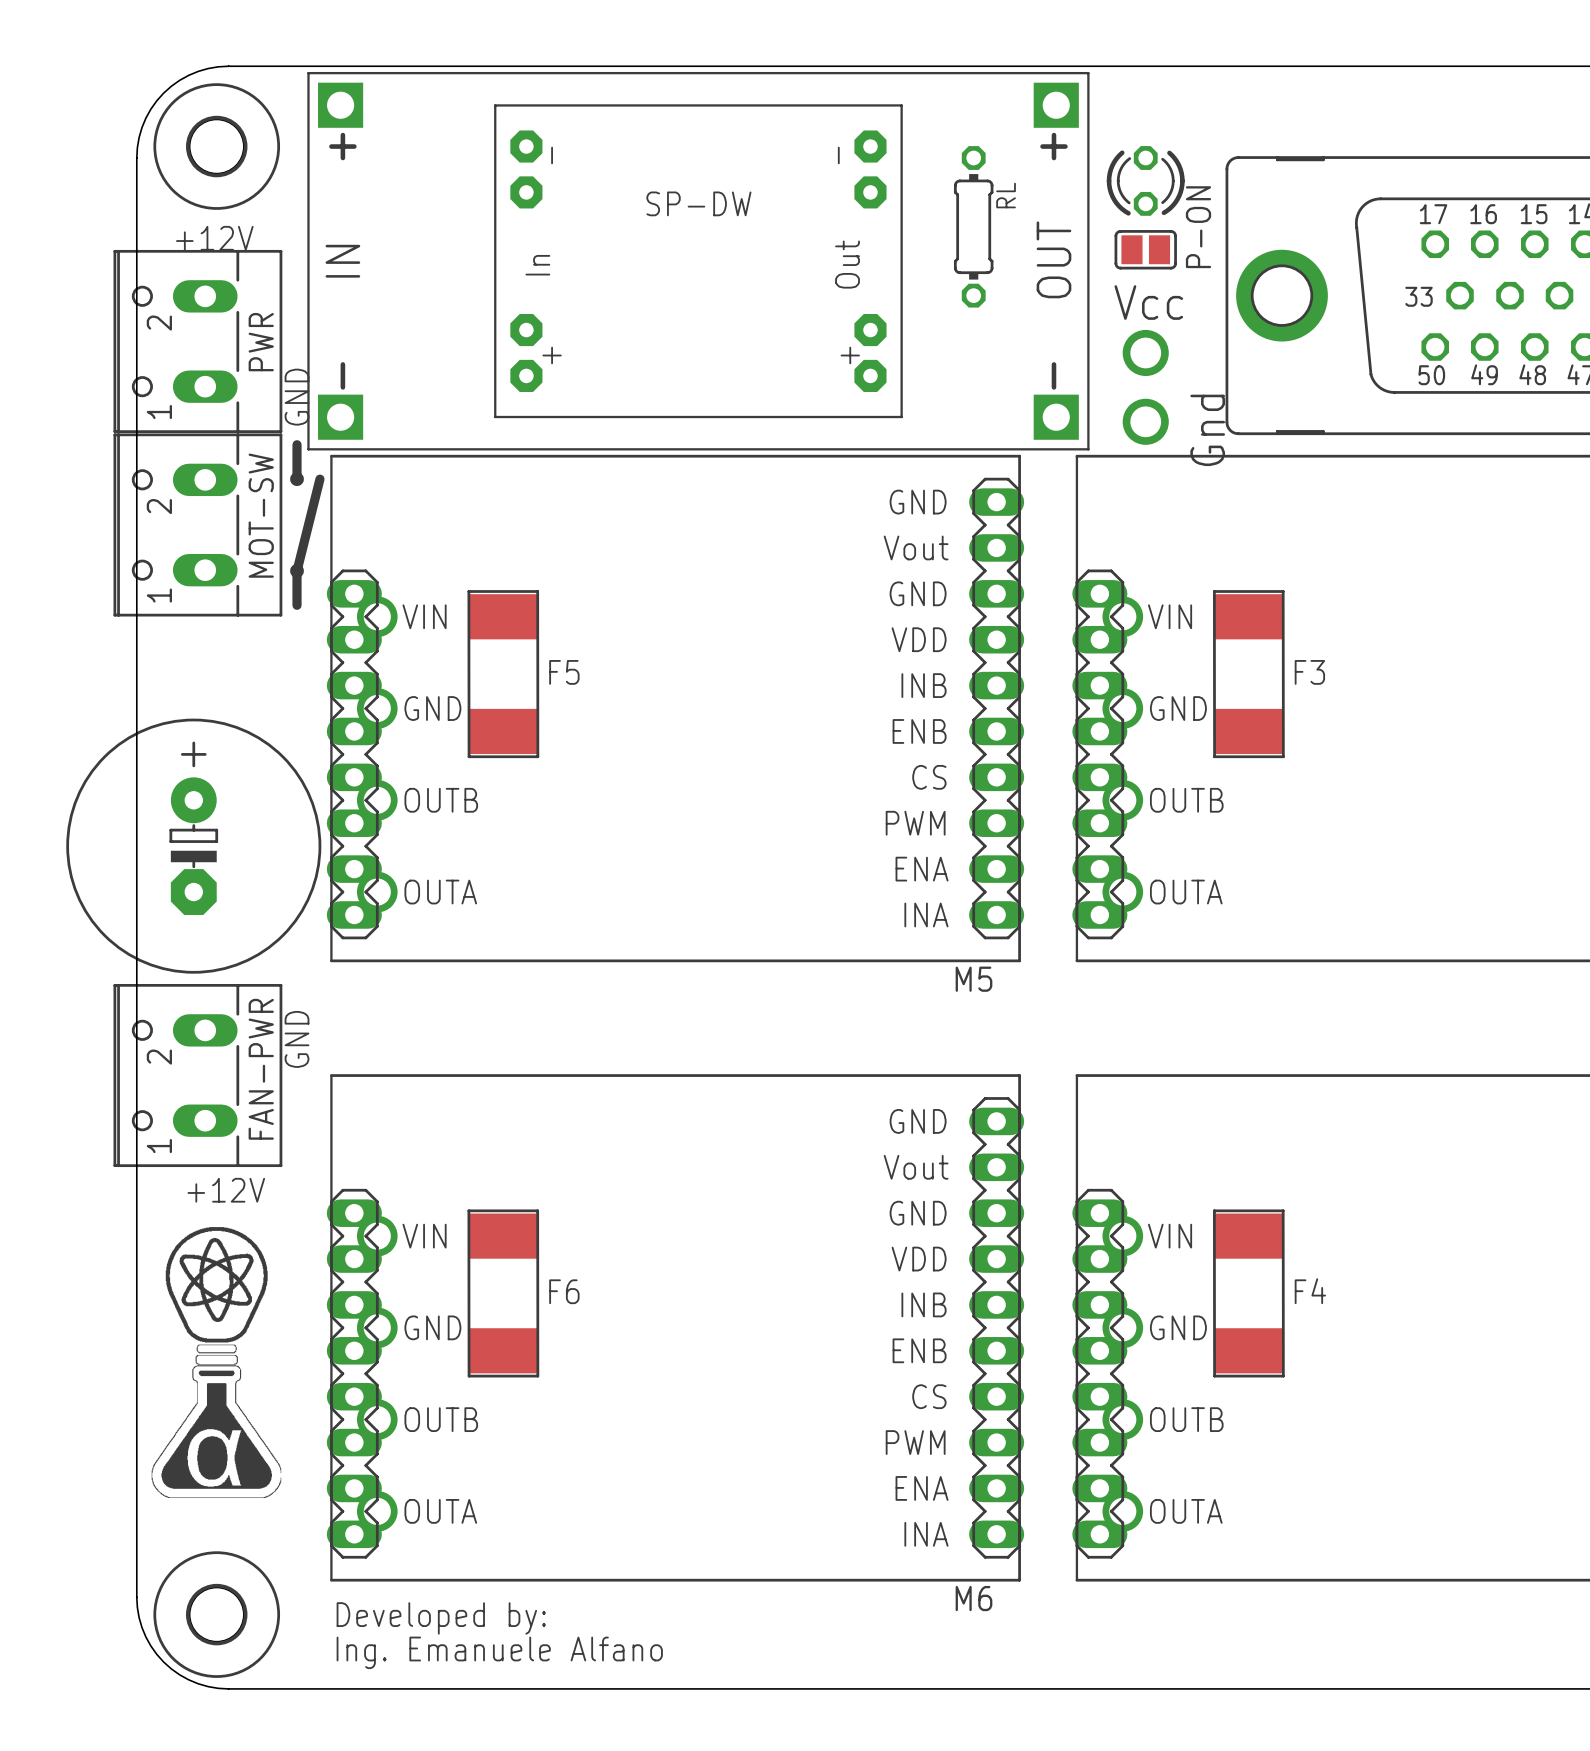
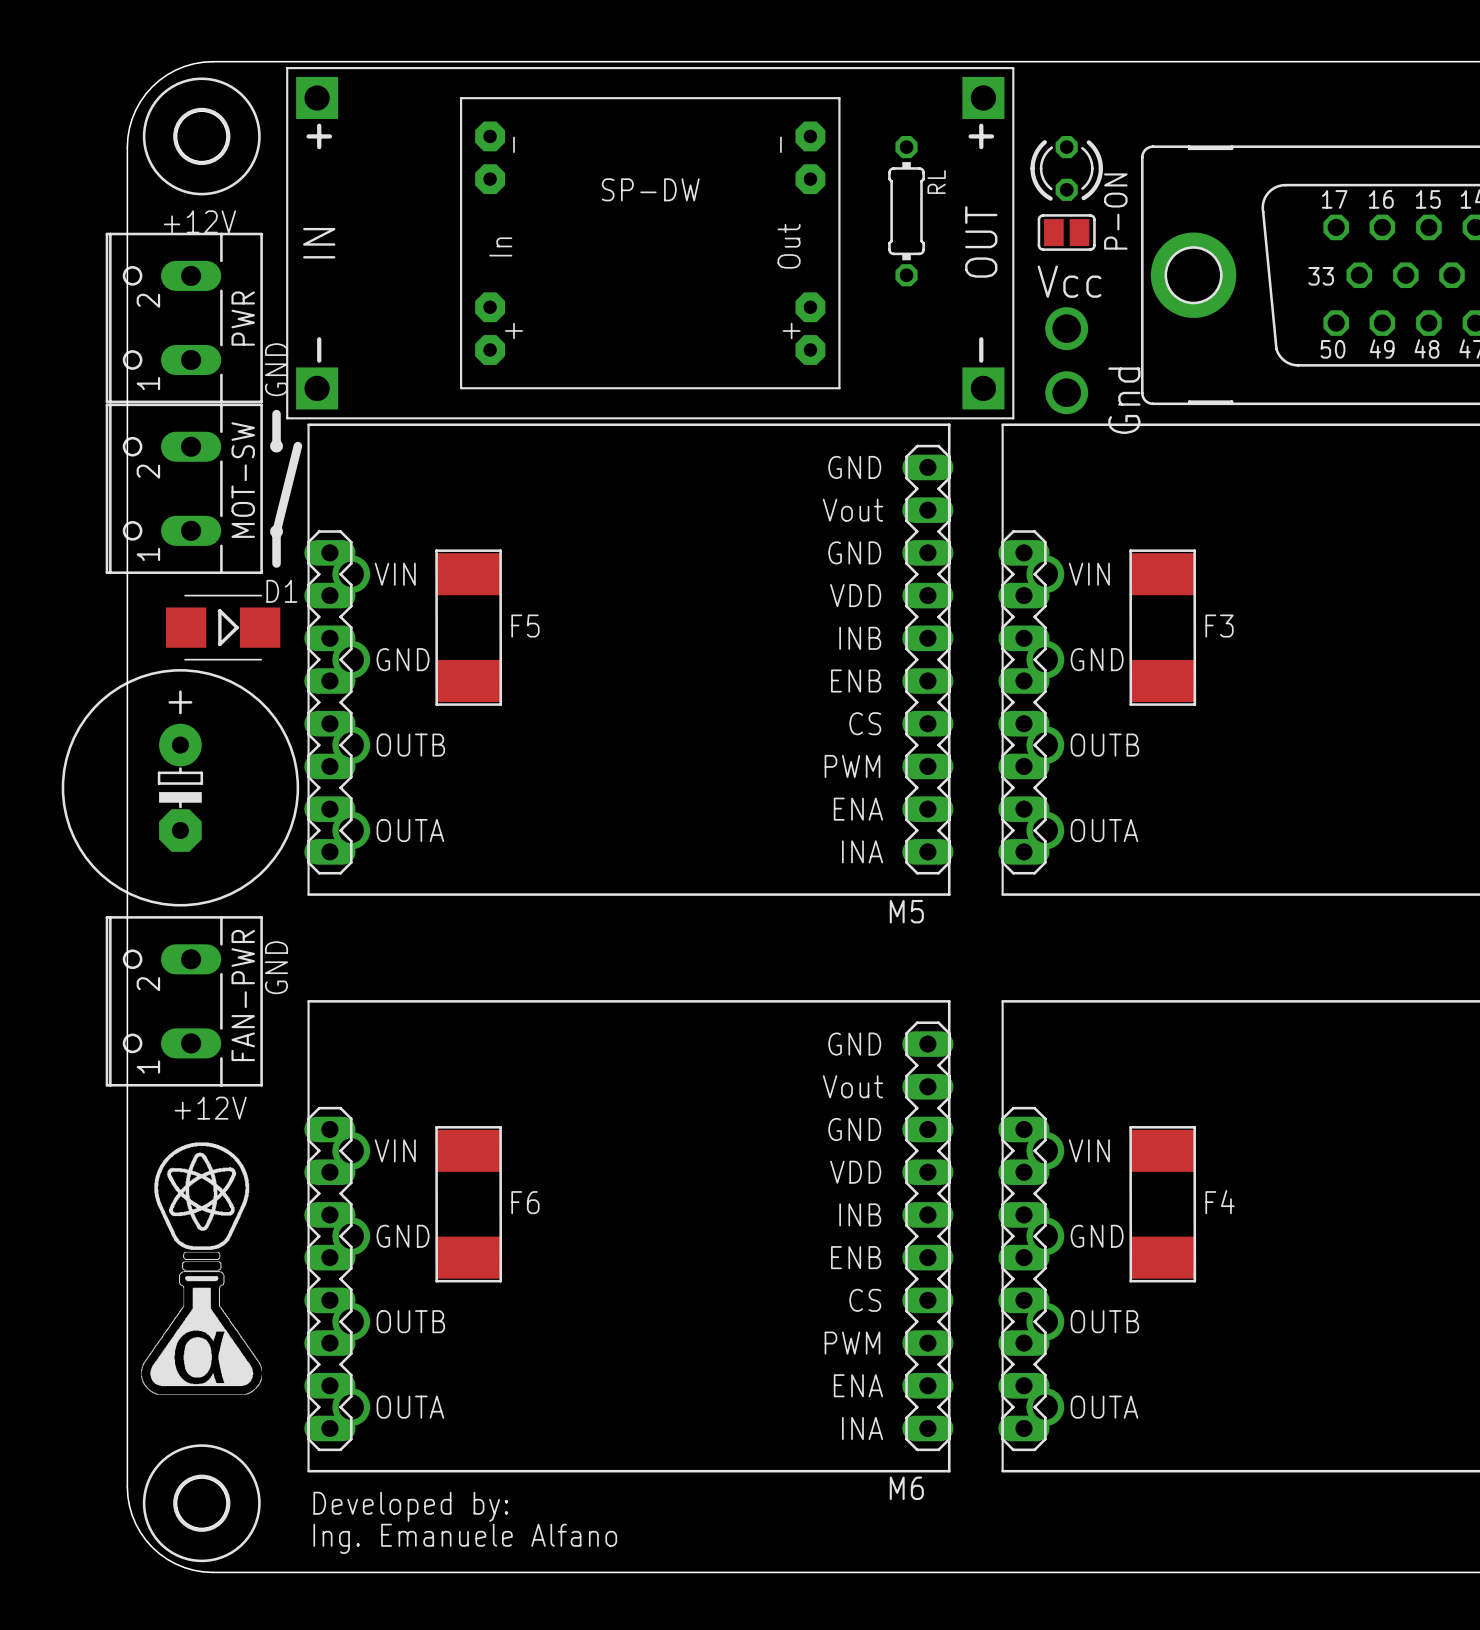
D1: none -> (223, 627)

